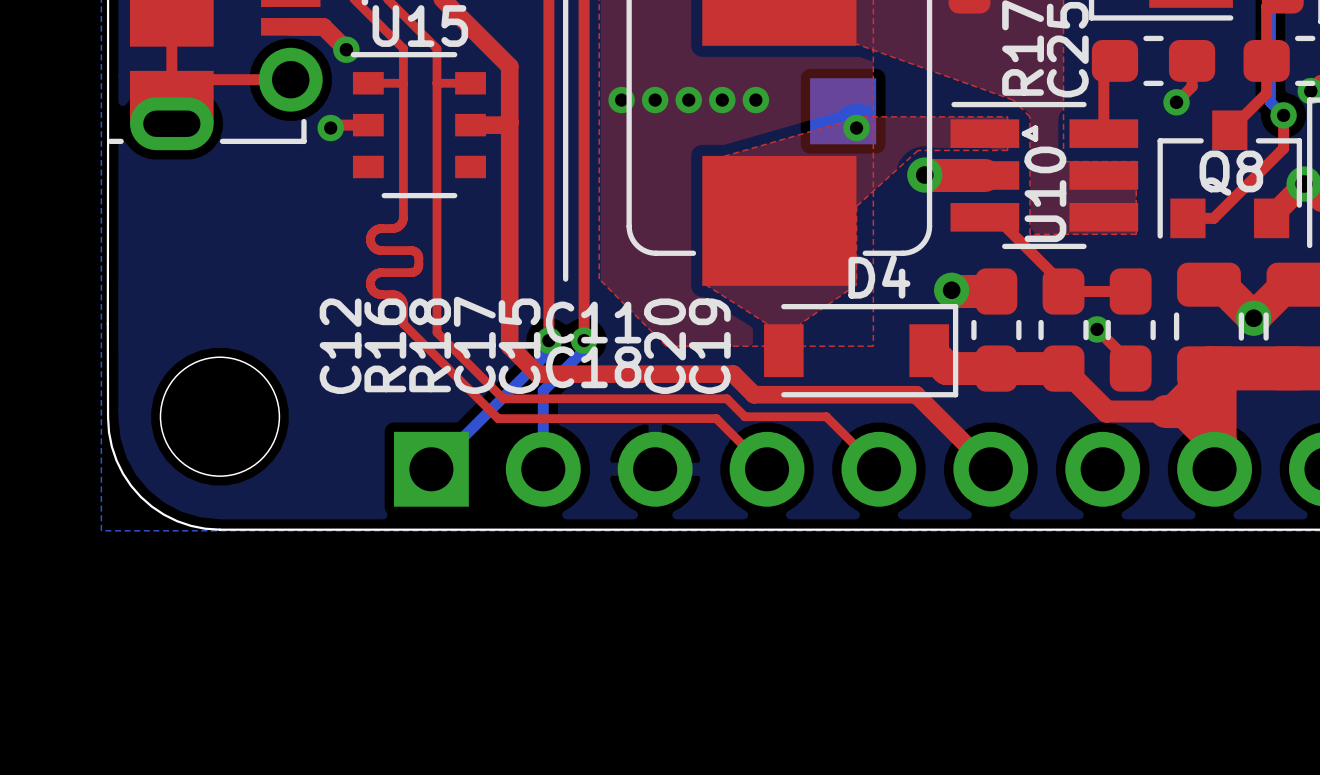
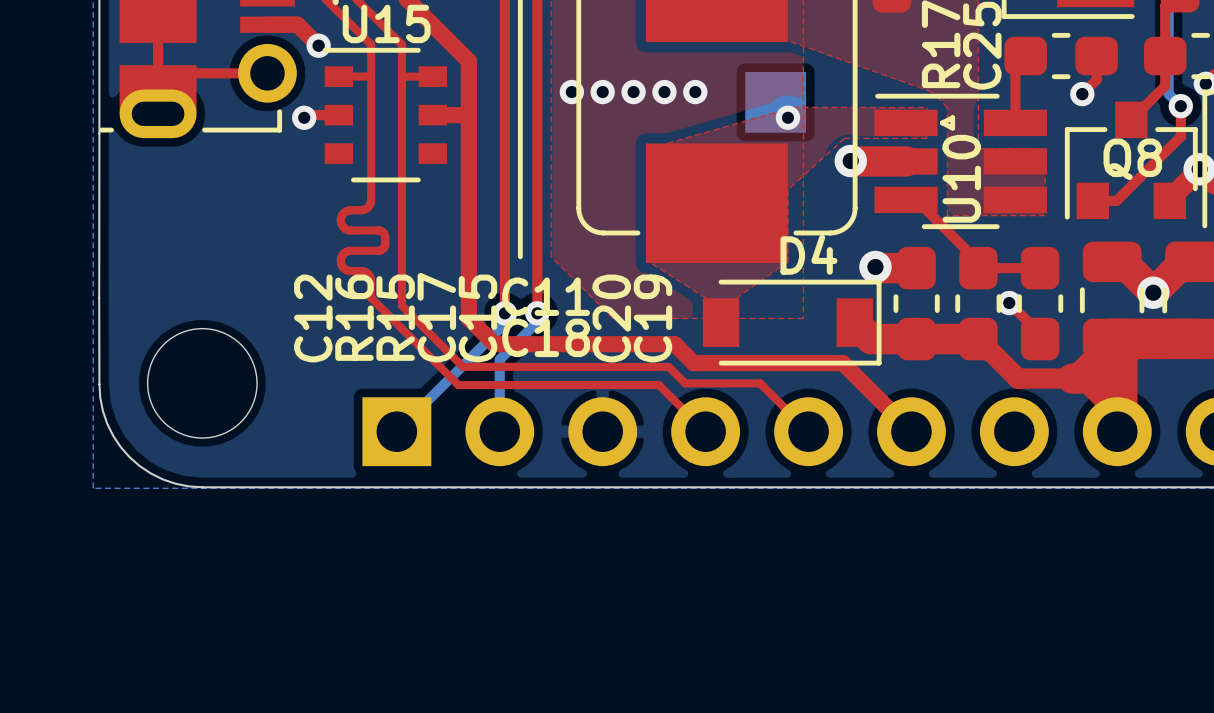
R18 name: R18 (430, 345) -> R15 (395, 317)

